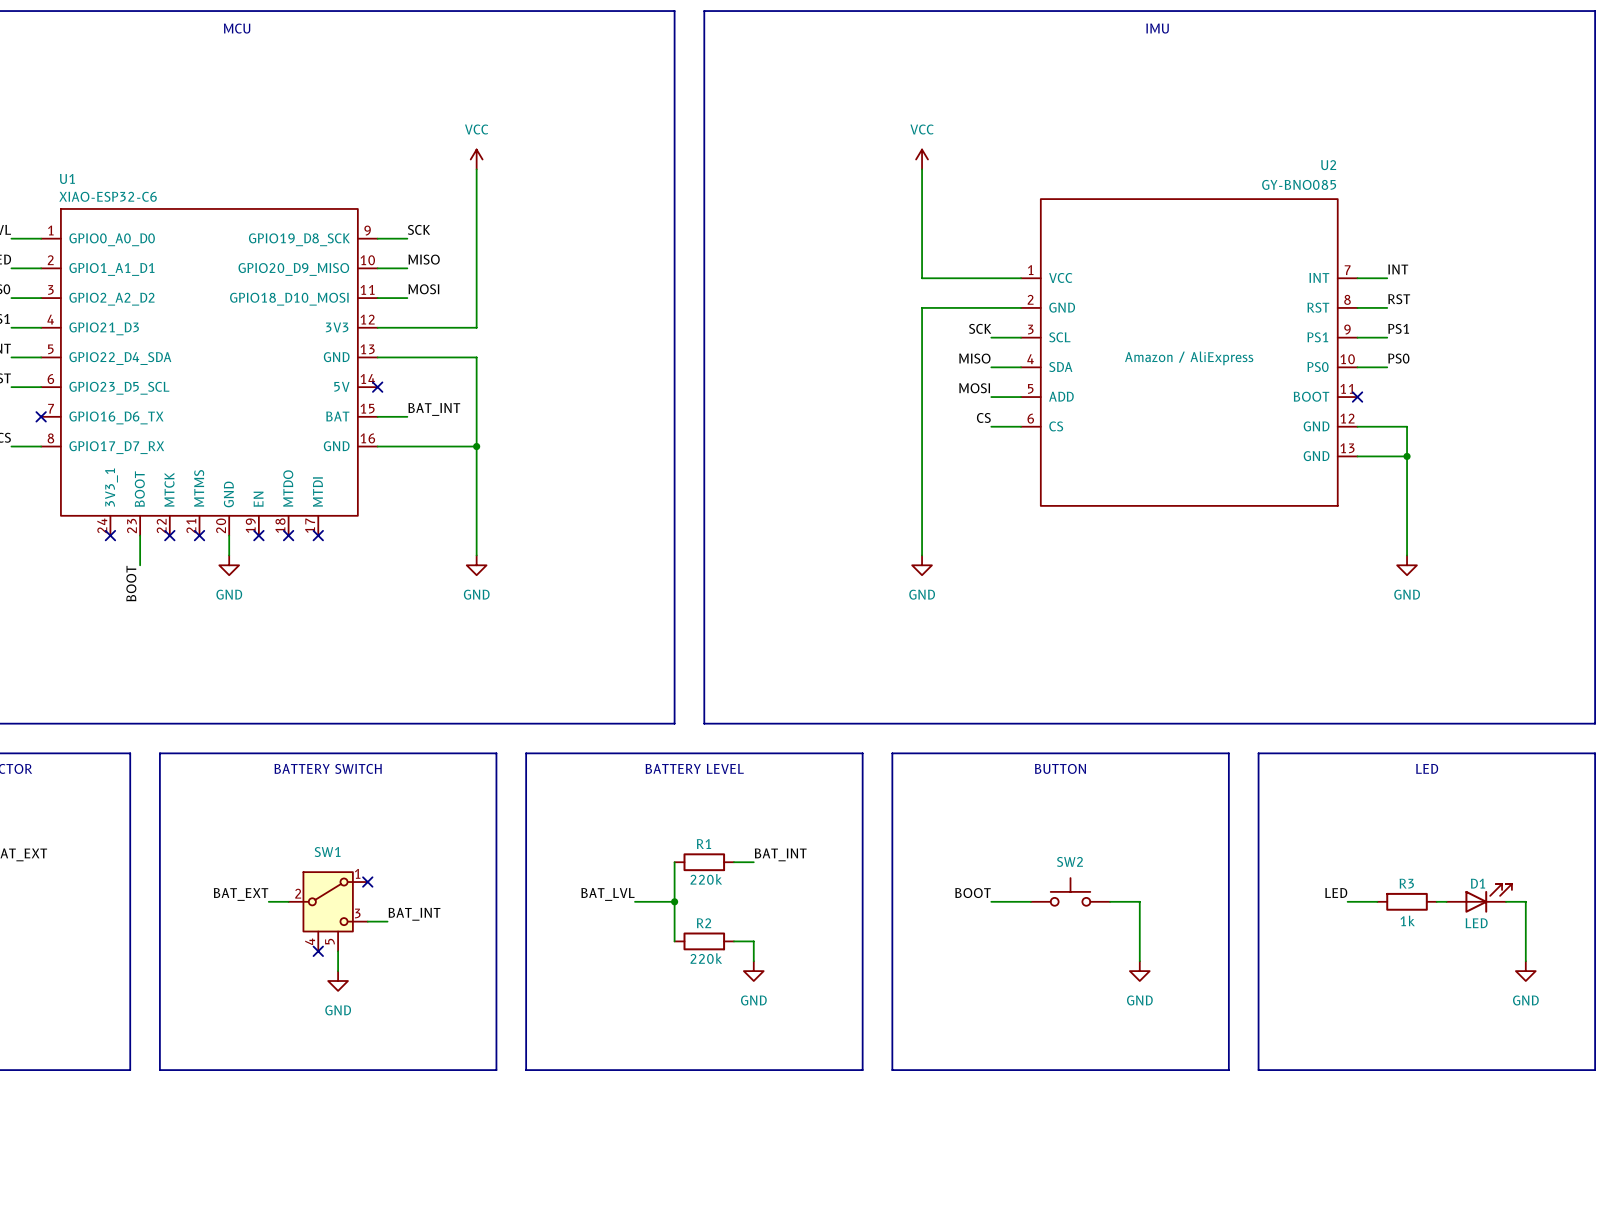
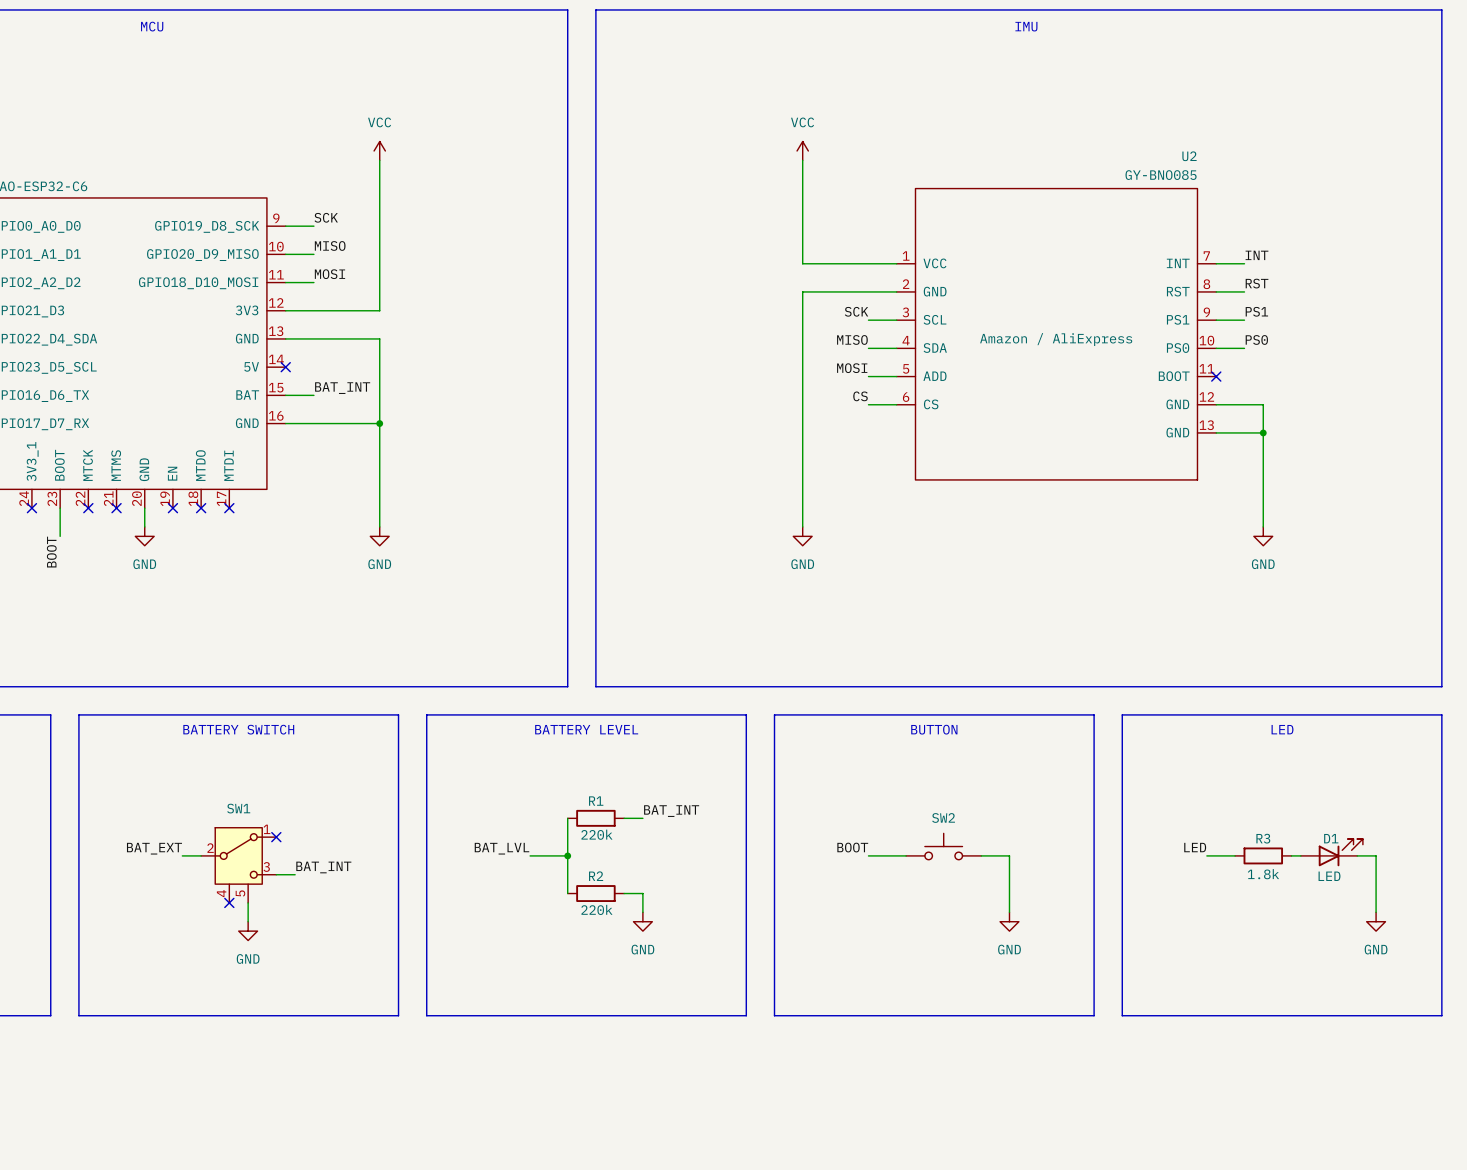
R3 value: 1k (1407, 920) -> 1.8k (1263, 874)

